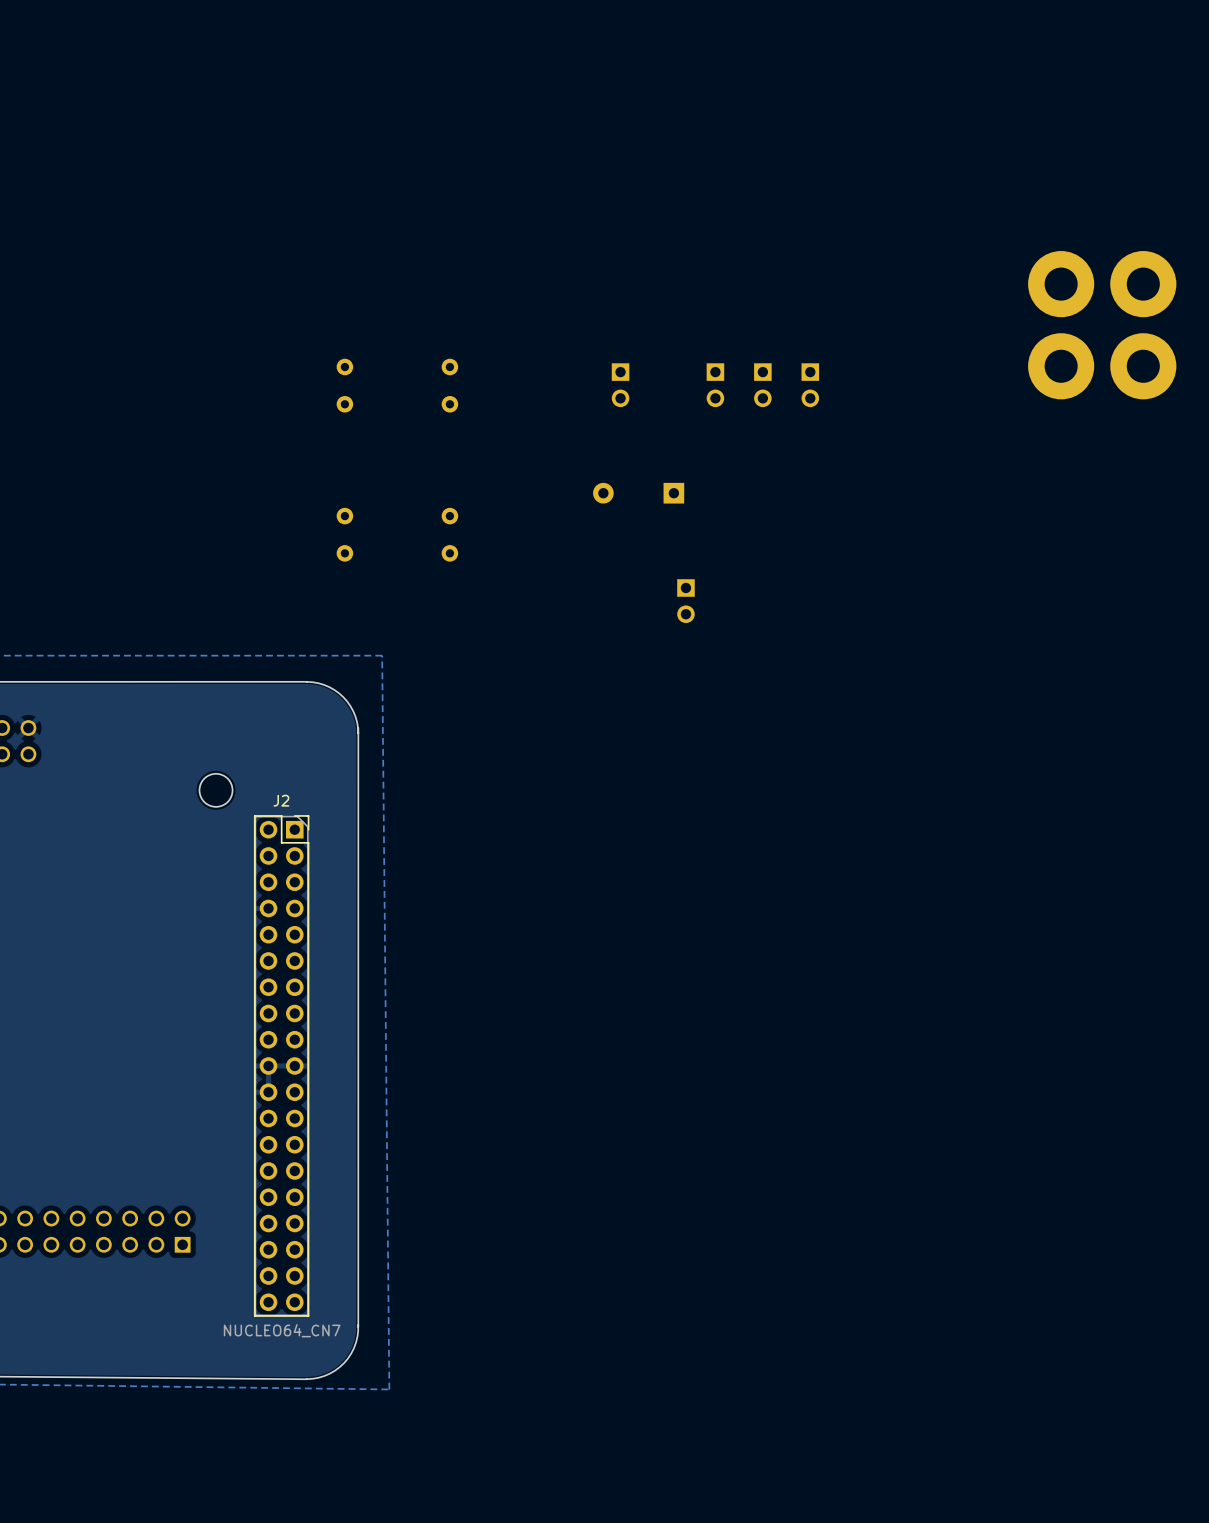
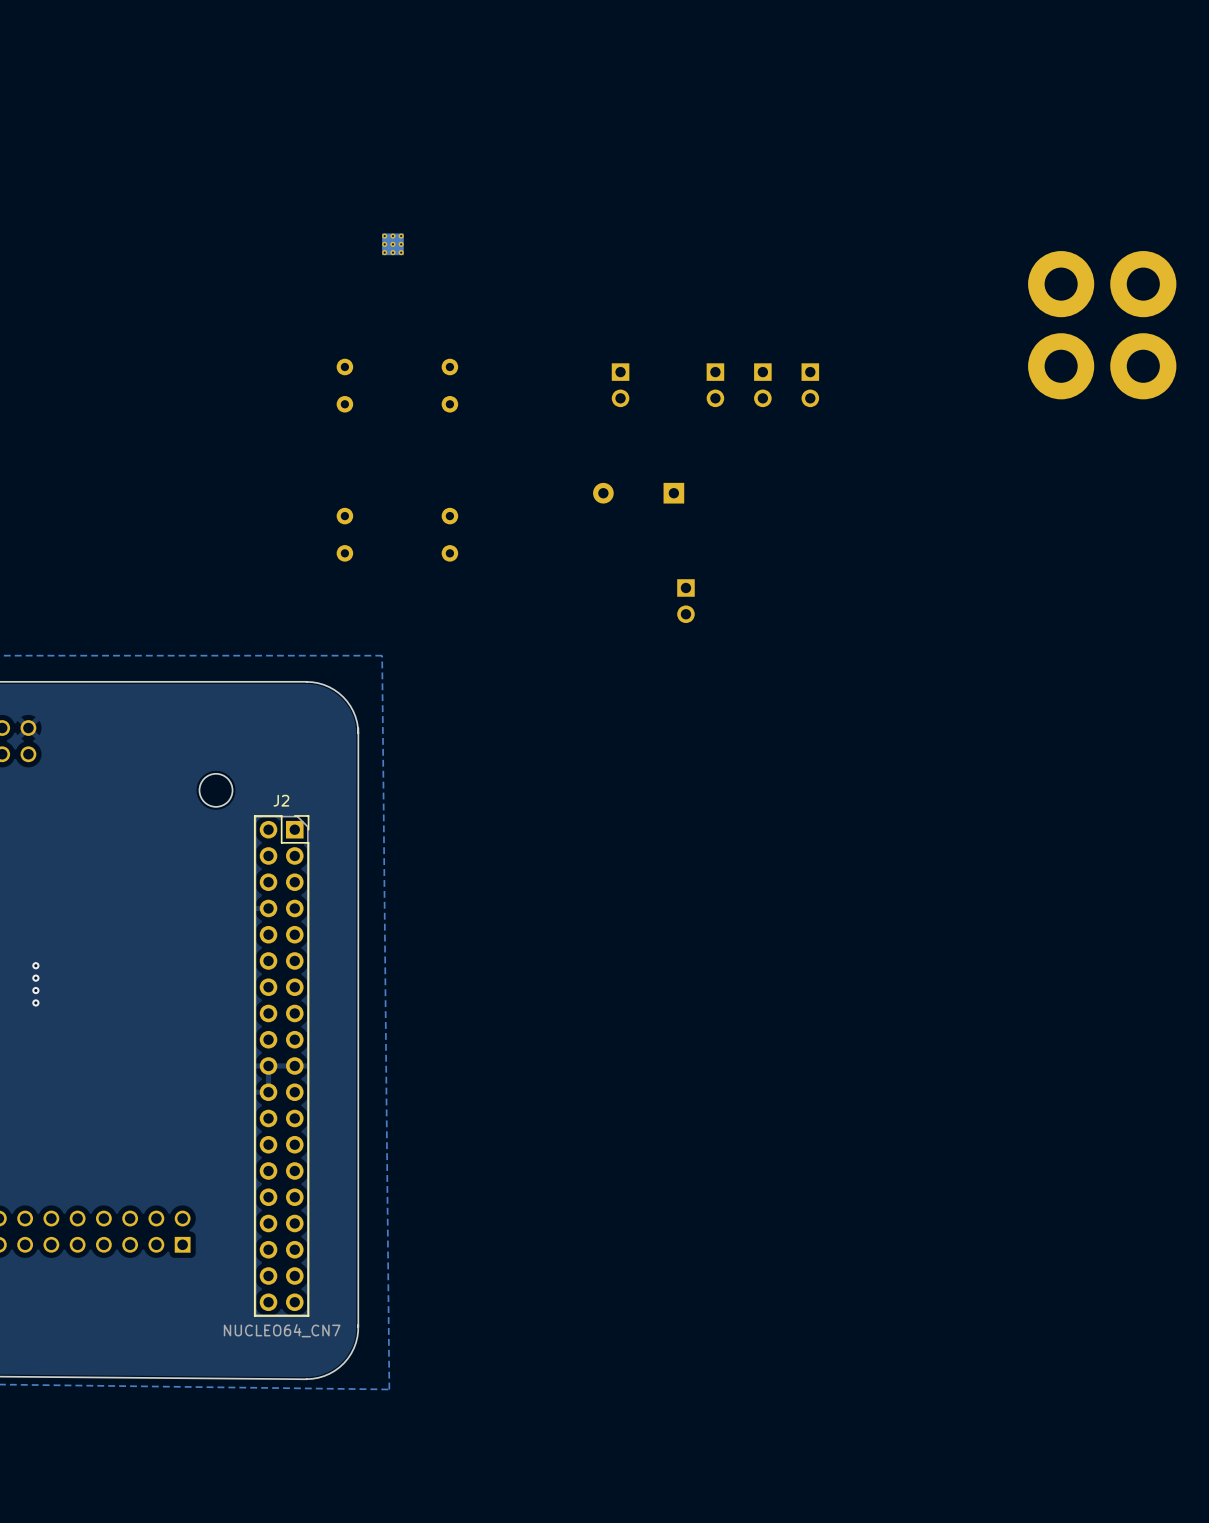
part: none -> (392, 244)
via: none -> (35, 965)
via: none -> (35, 978)
via: none -> (35, 990)
via: none -> (35, 1002)

